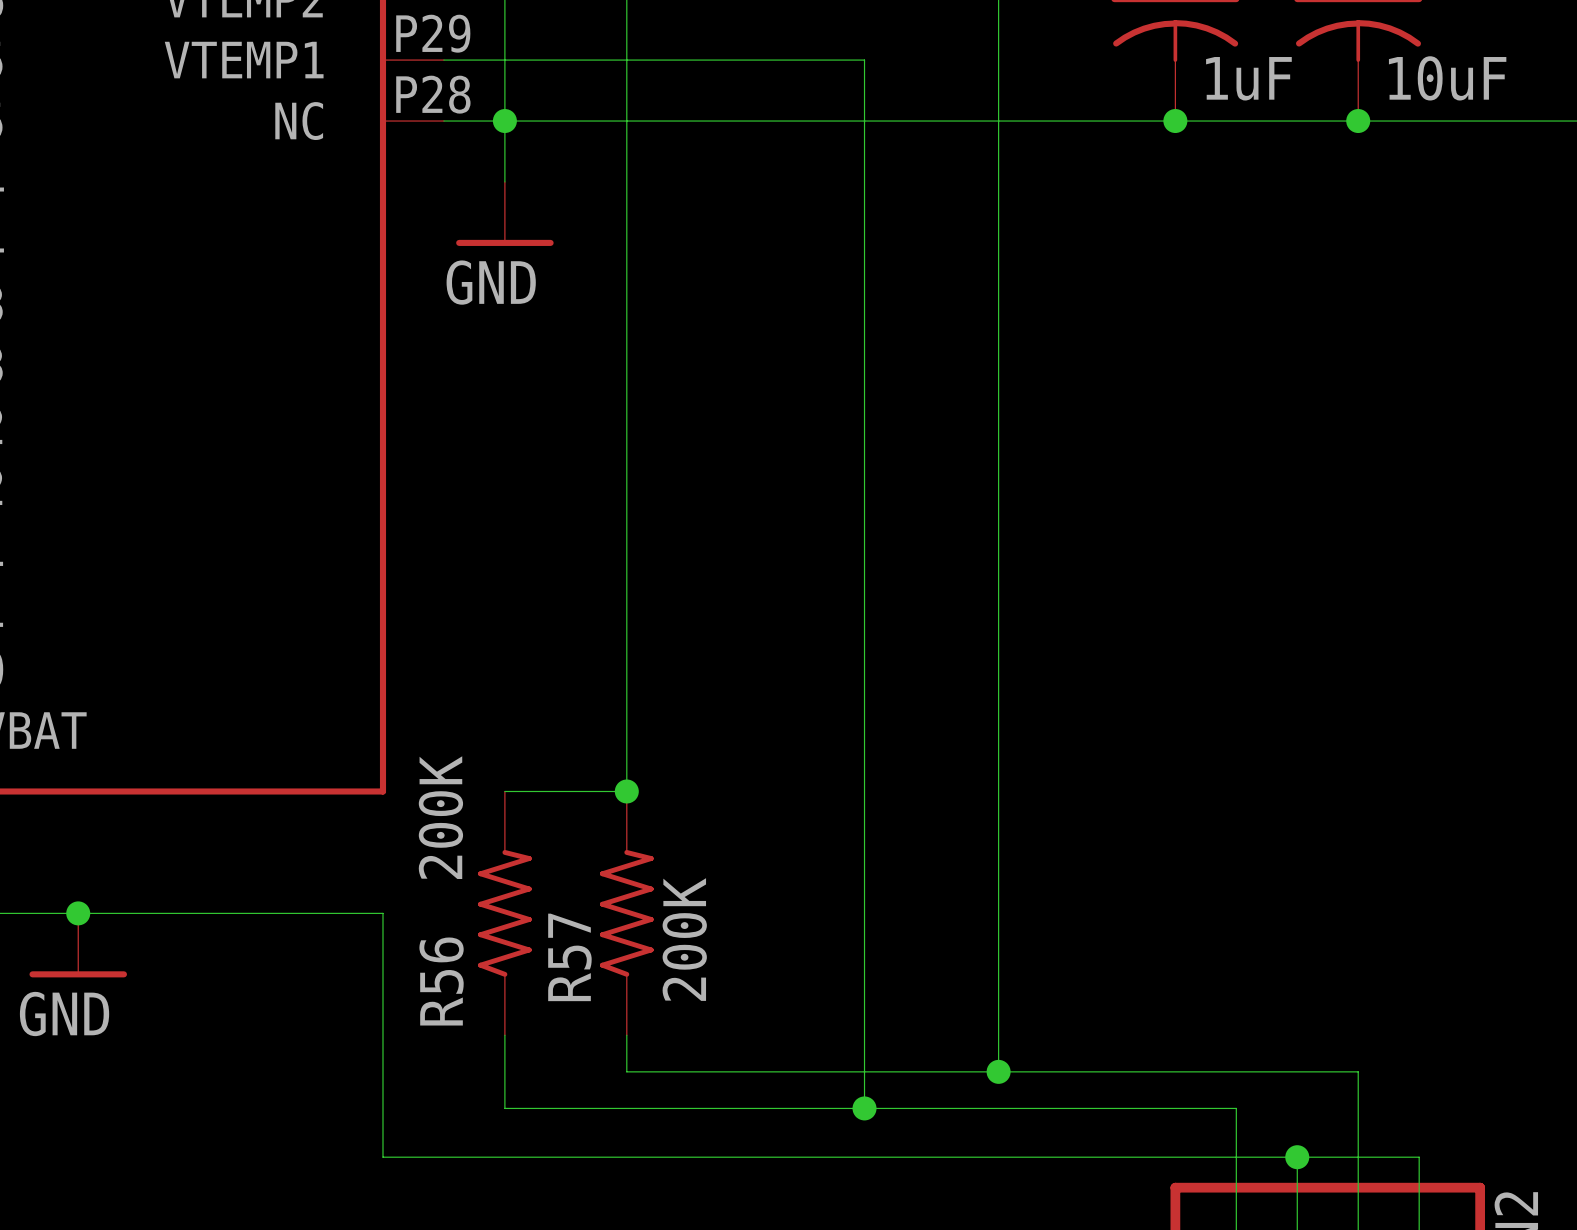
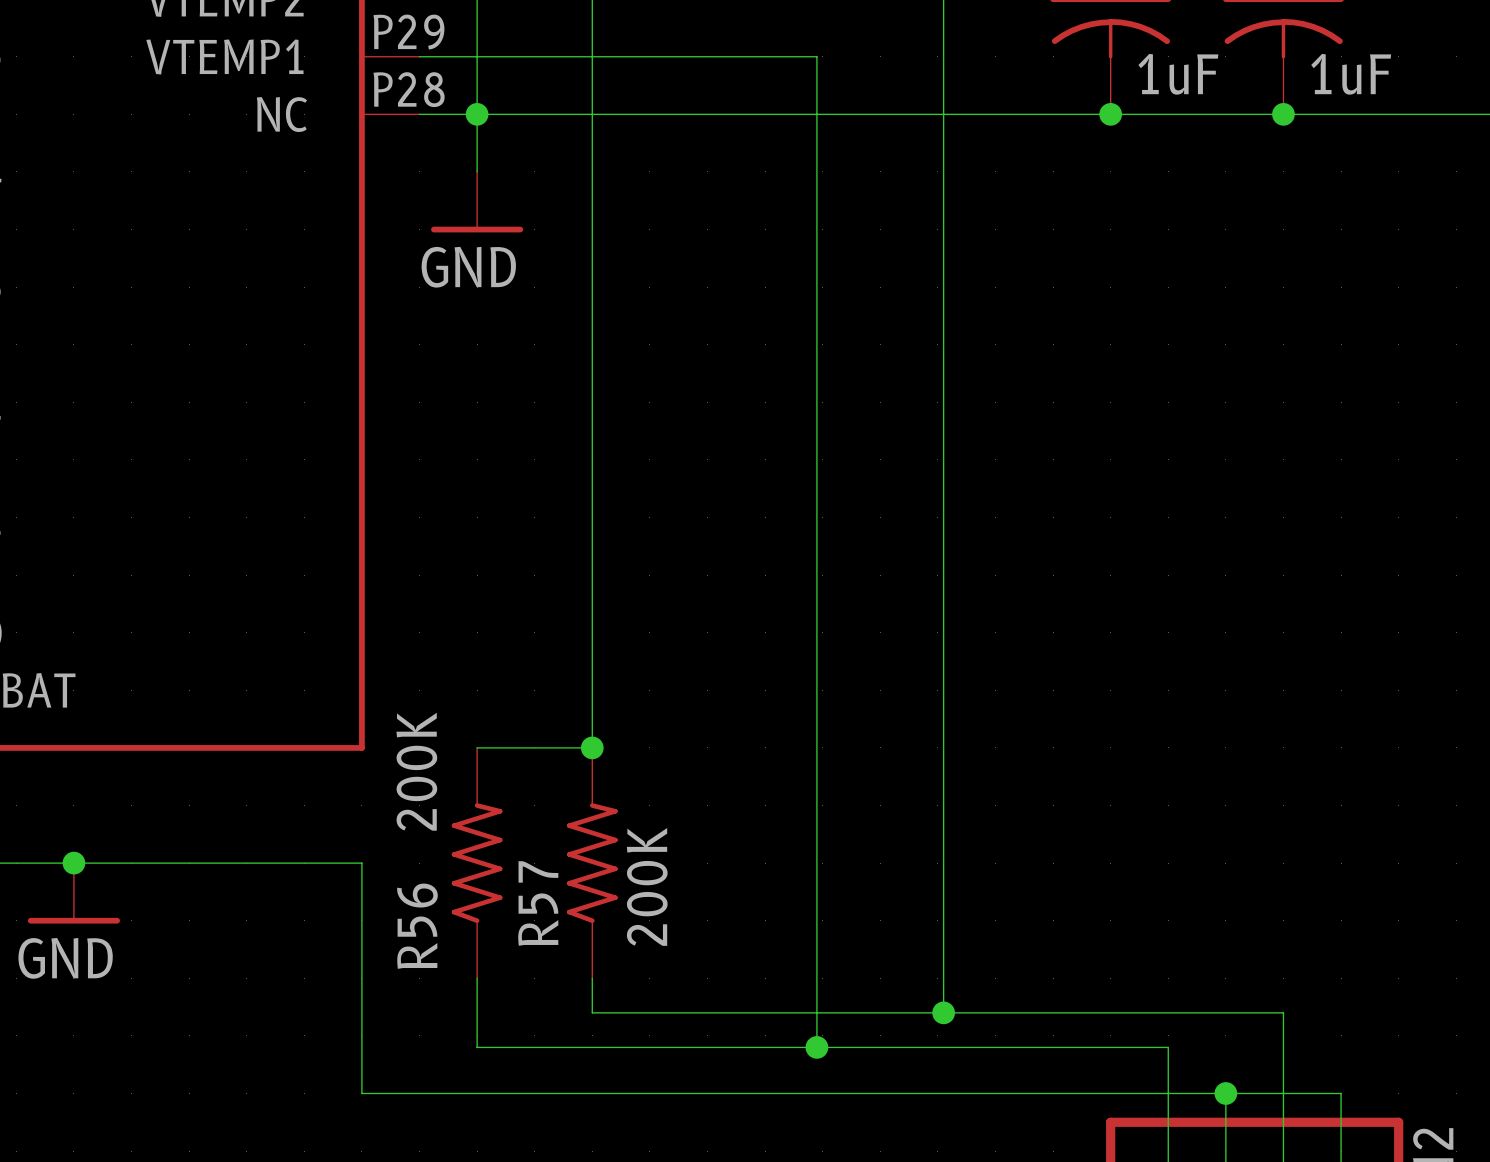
part value: 10uF (1447, 78) -> 1uF (1351, 74)

